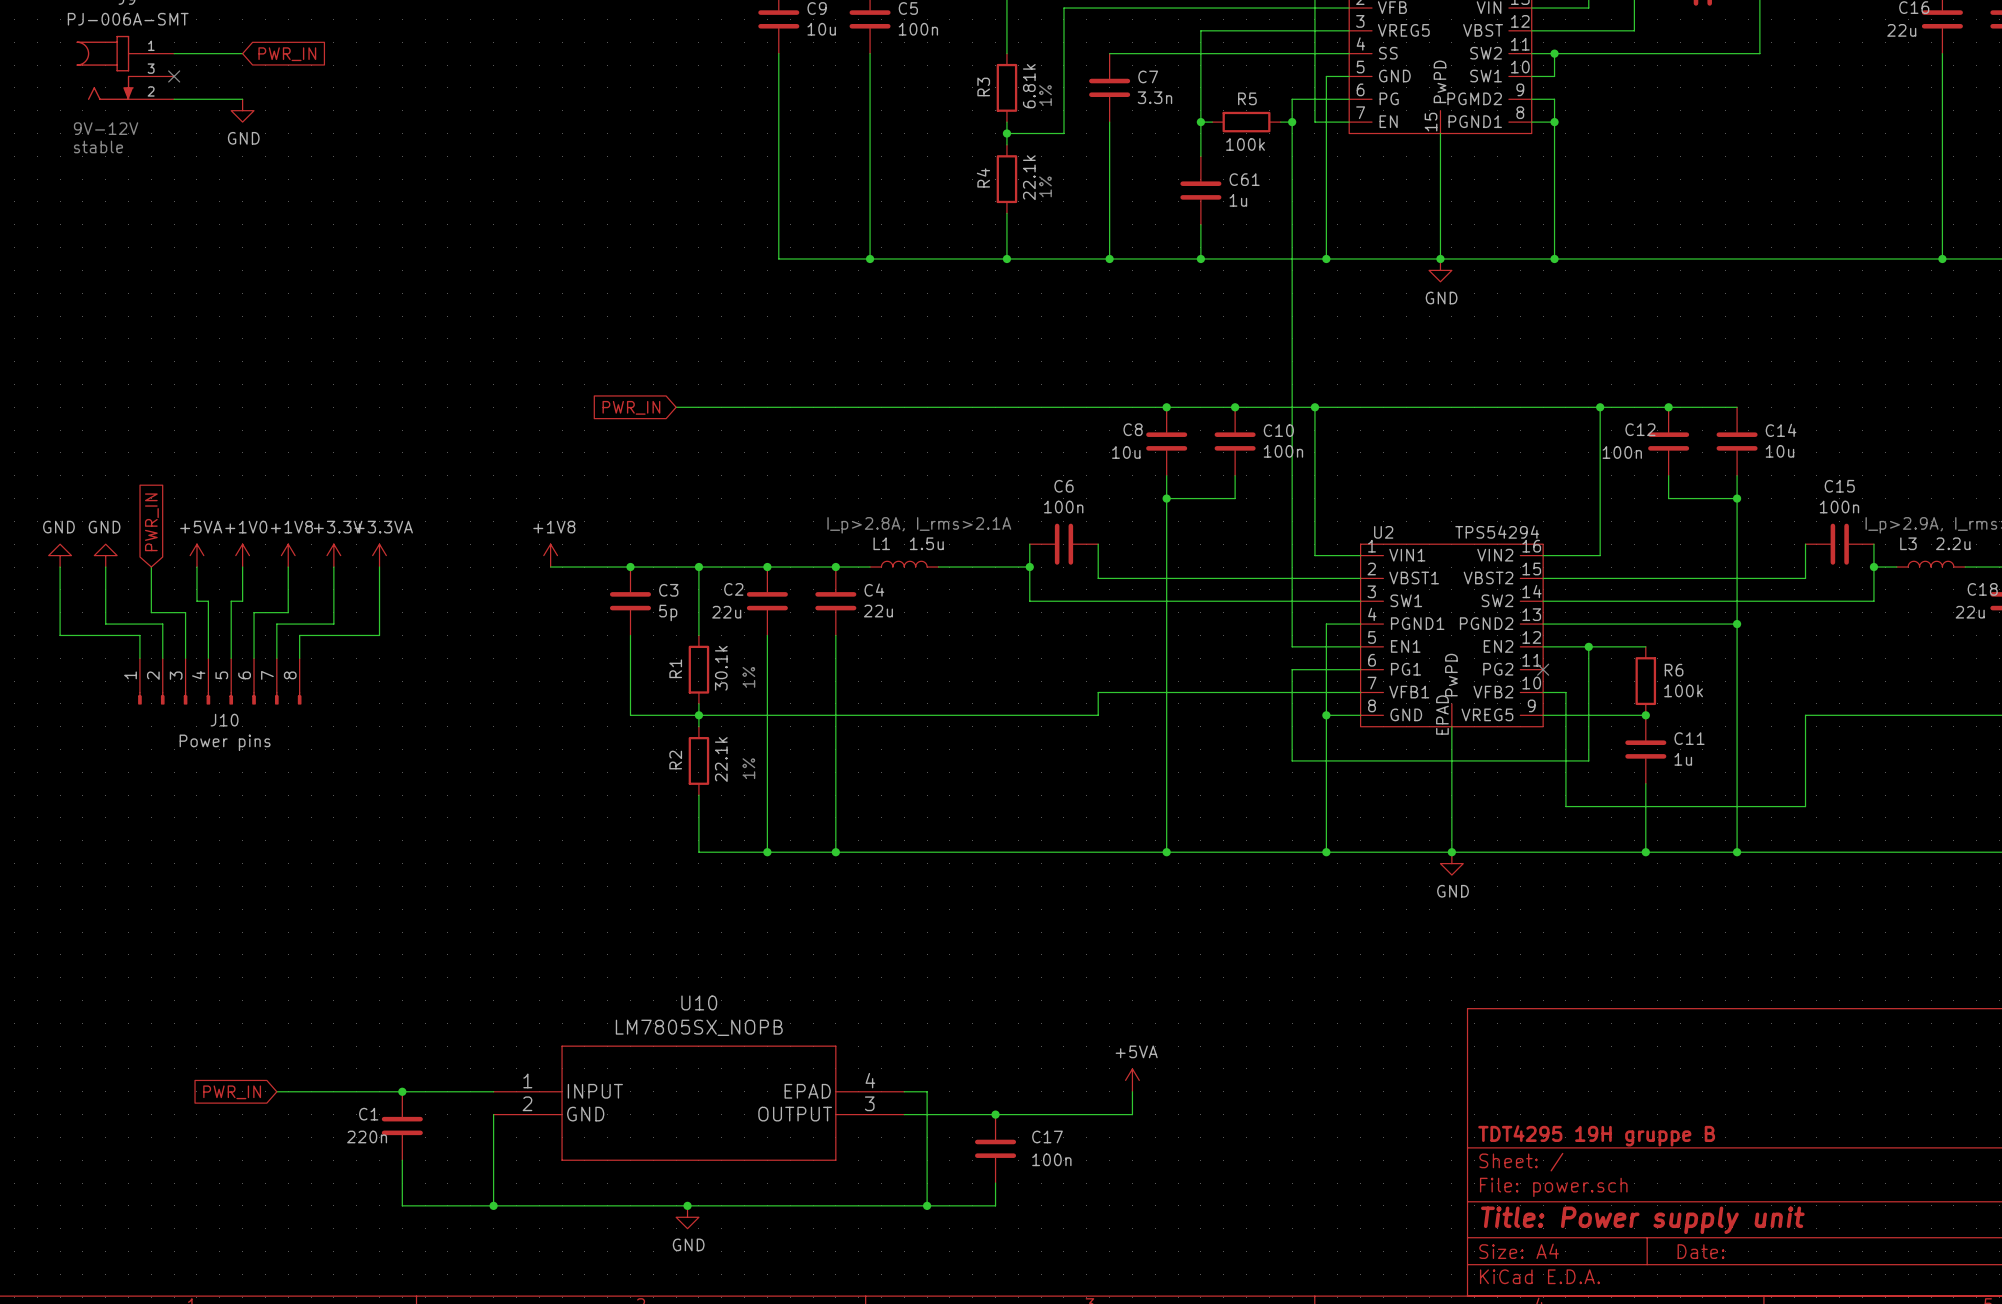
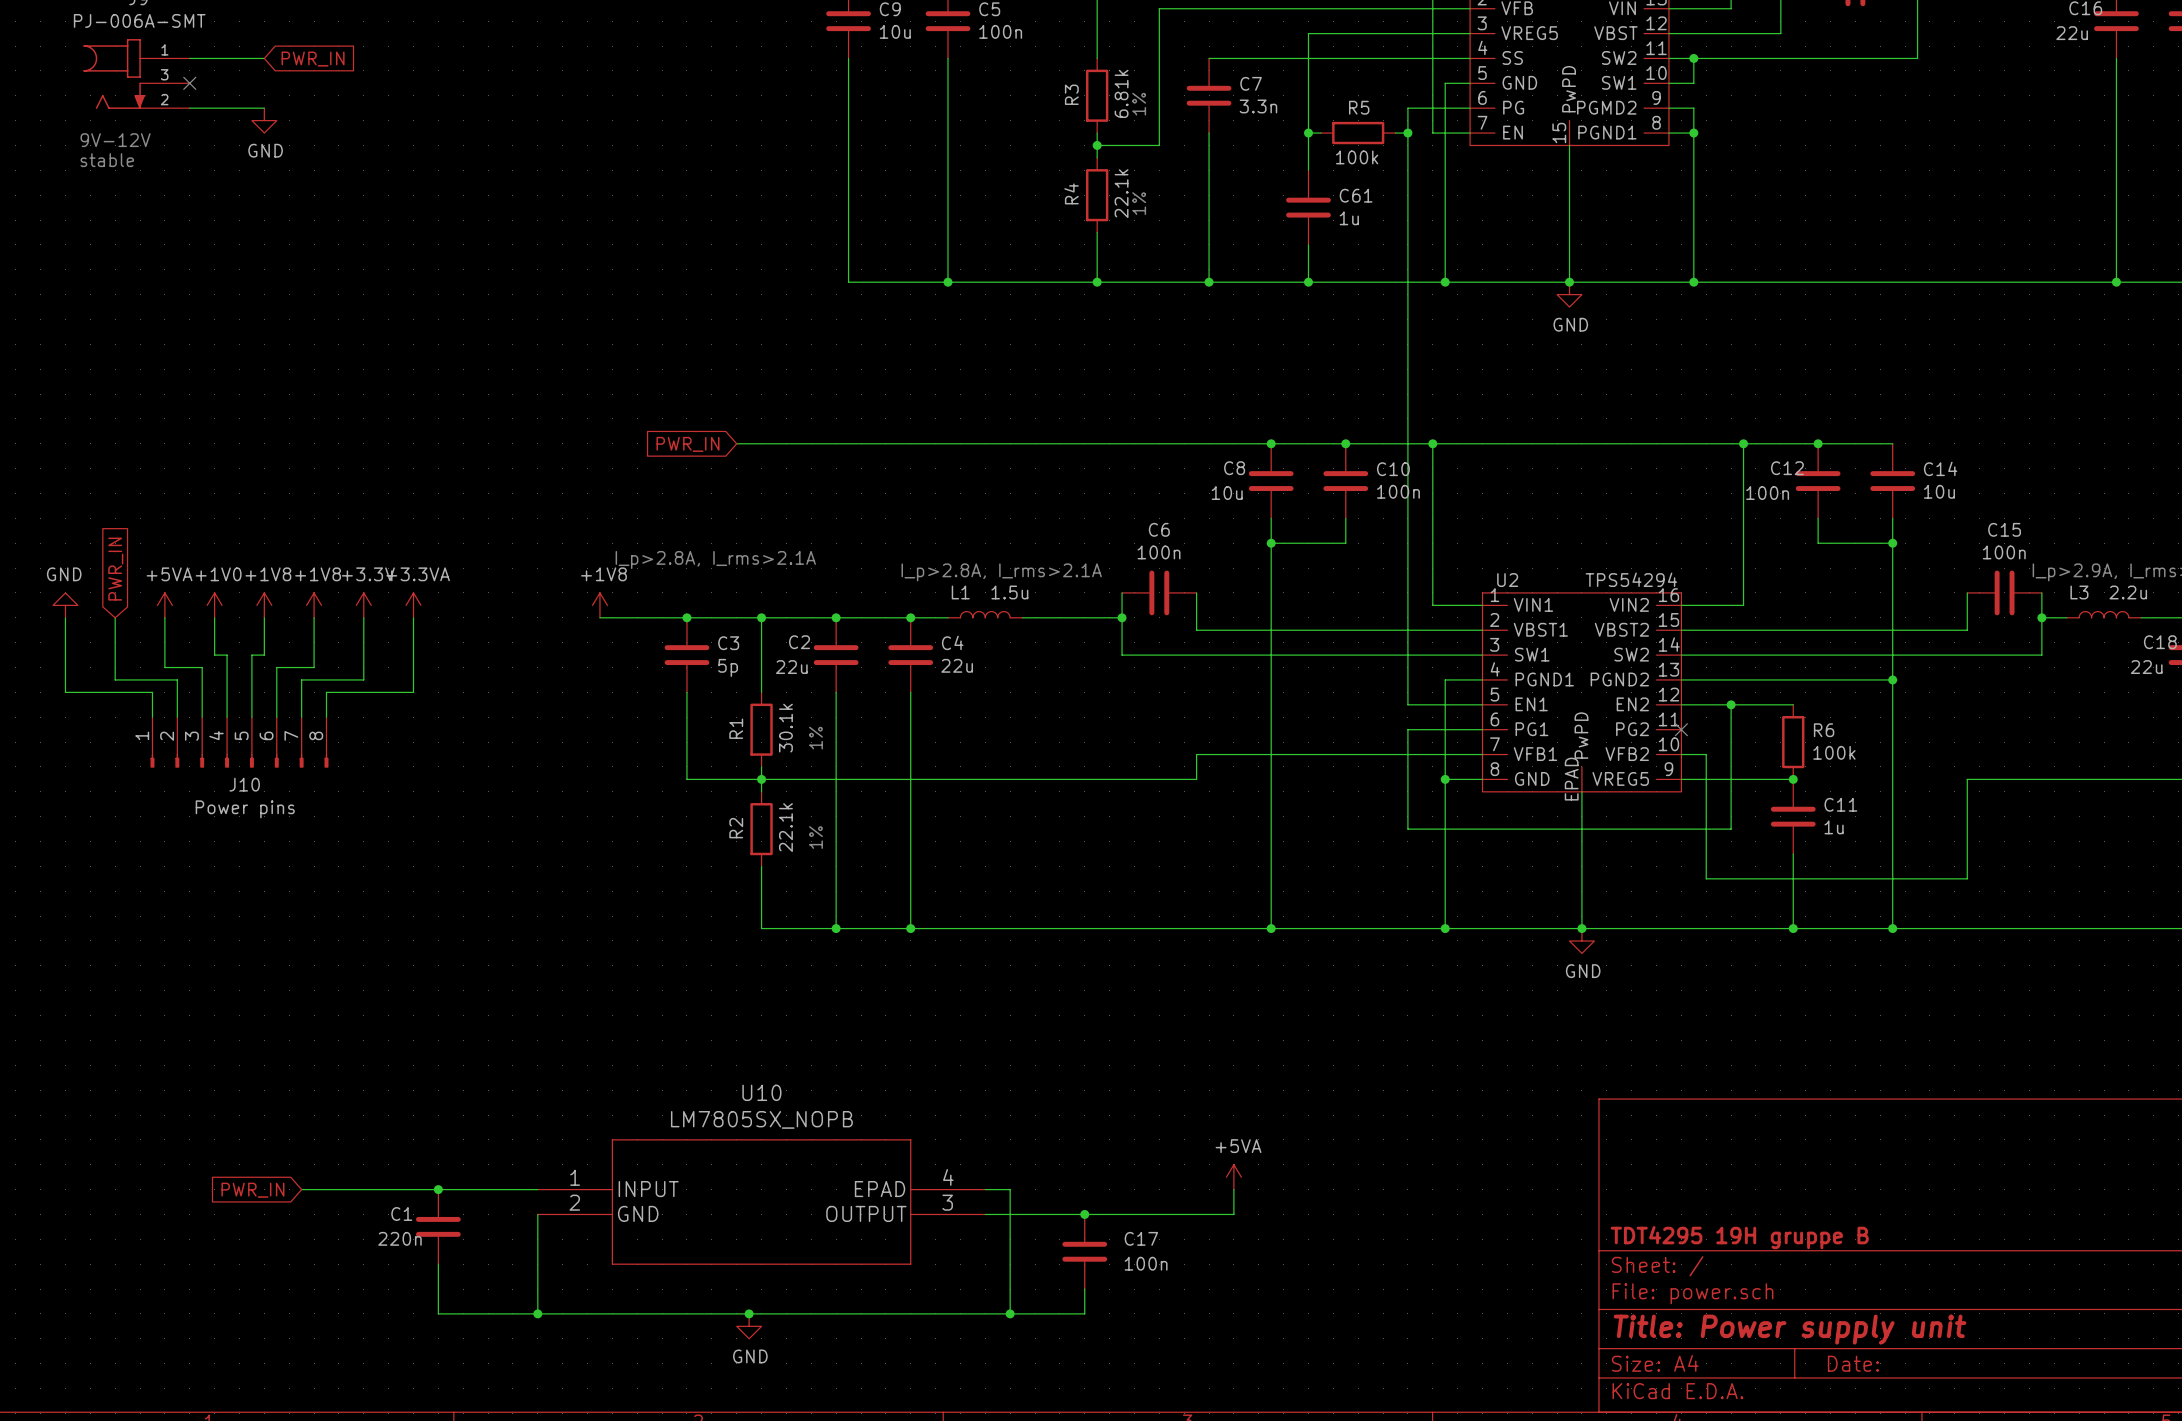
text: none -> I_p>2.8A, I_rms>2.1A (715, 559)
global label position: PWR_IN (151, 522) -> PWR_IN (115, 569)
power symbol: GND (105, 555) -> none
power symbol: none -> +5VA (164, 605)
power symbol: +5VA (196, 555) -> +1V0 (214, 605)
power symbol: +1V0 (242, 555) -> +1V8 (264, 605)

